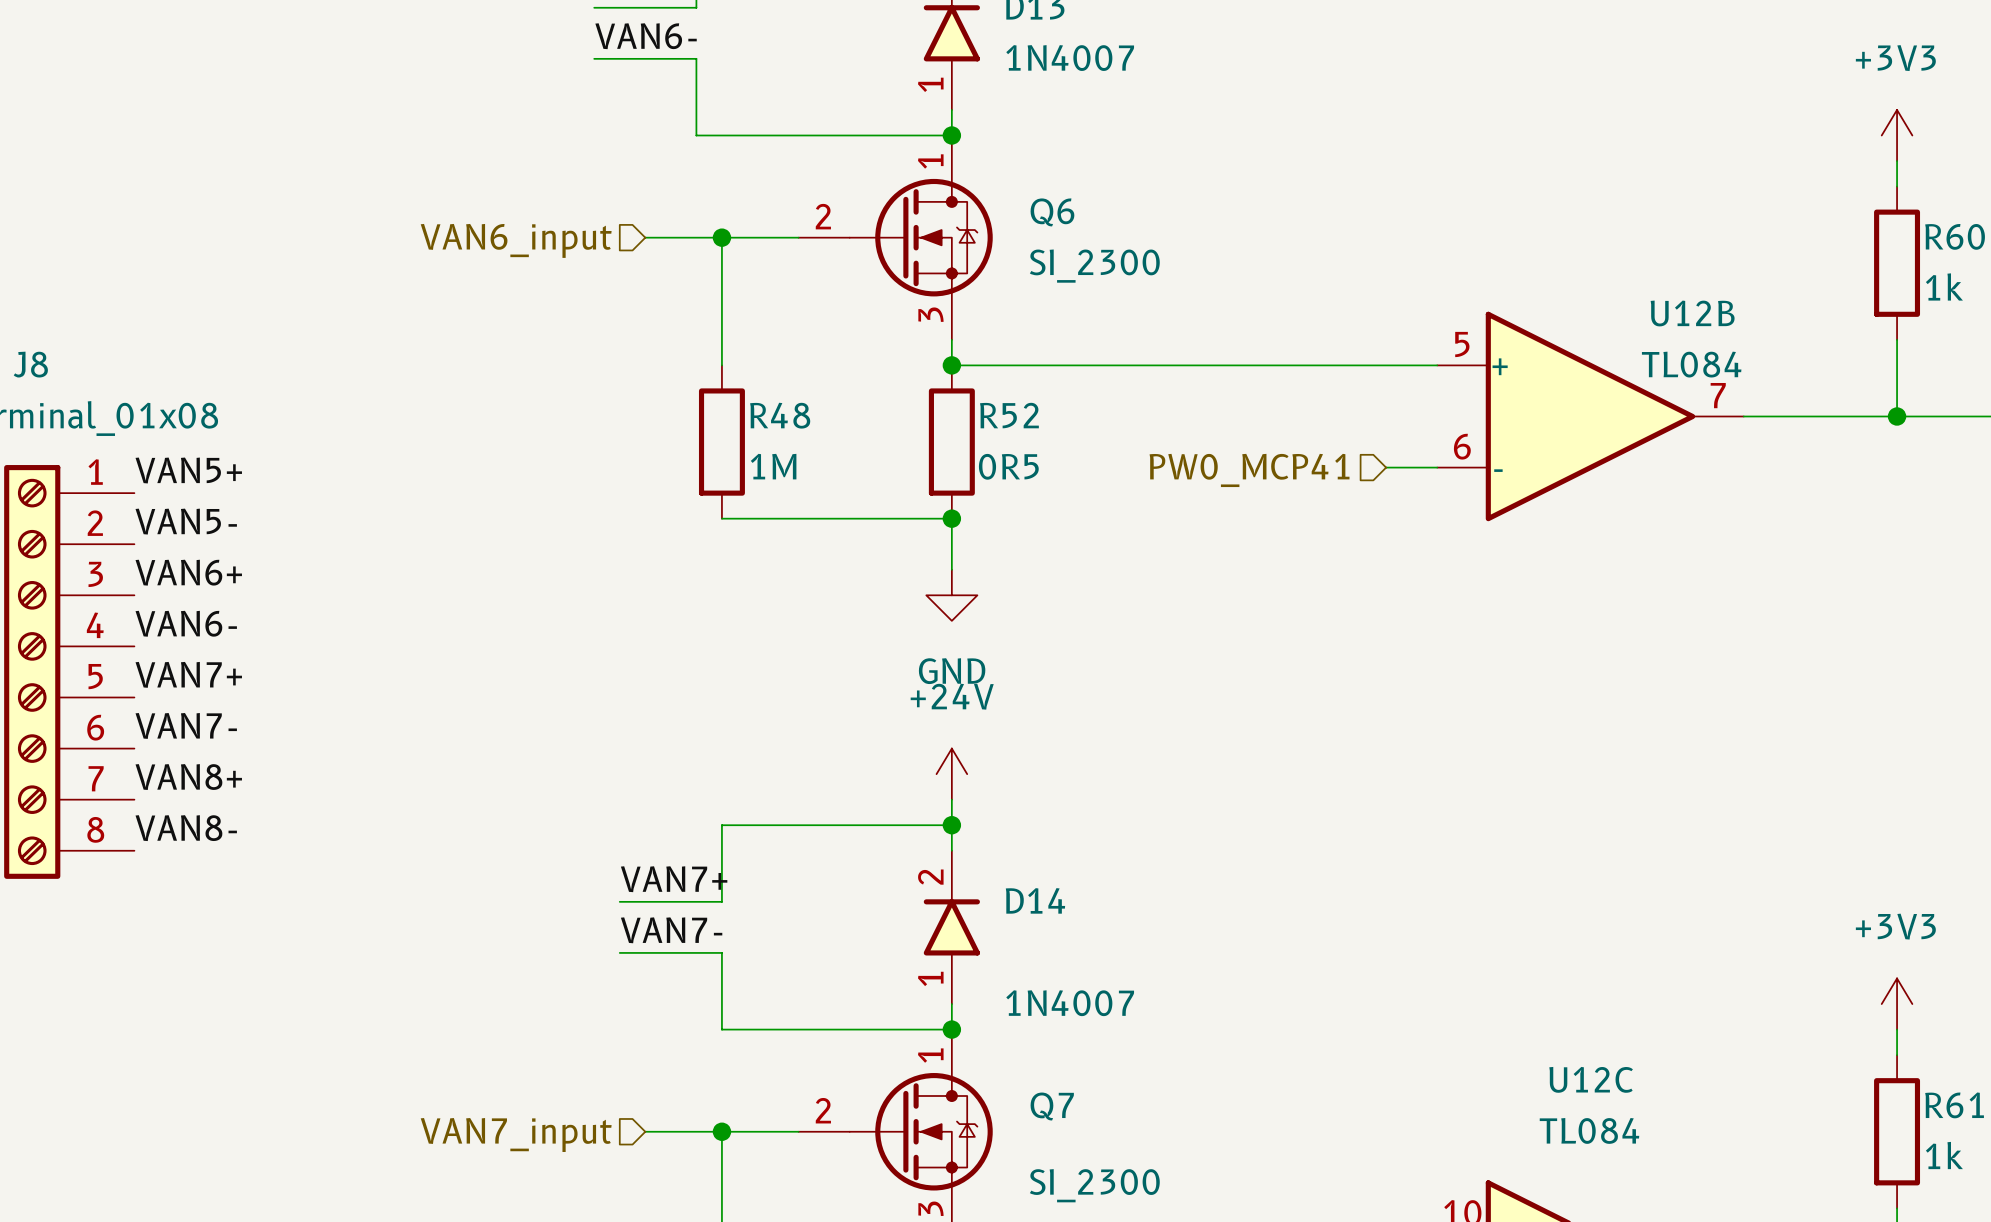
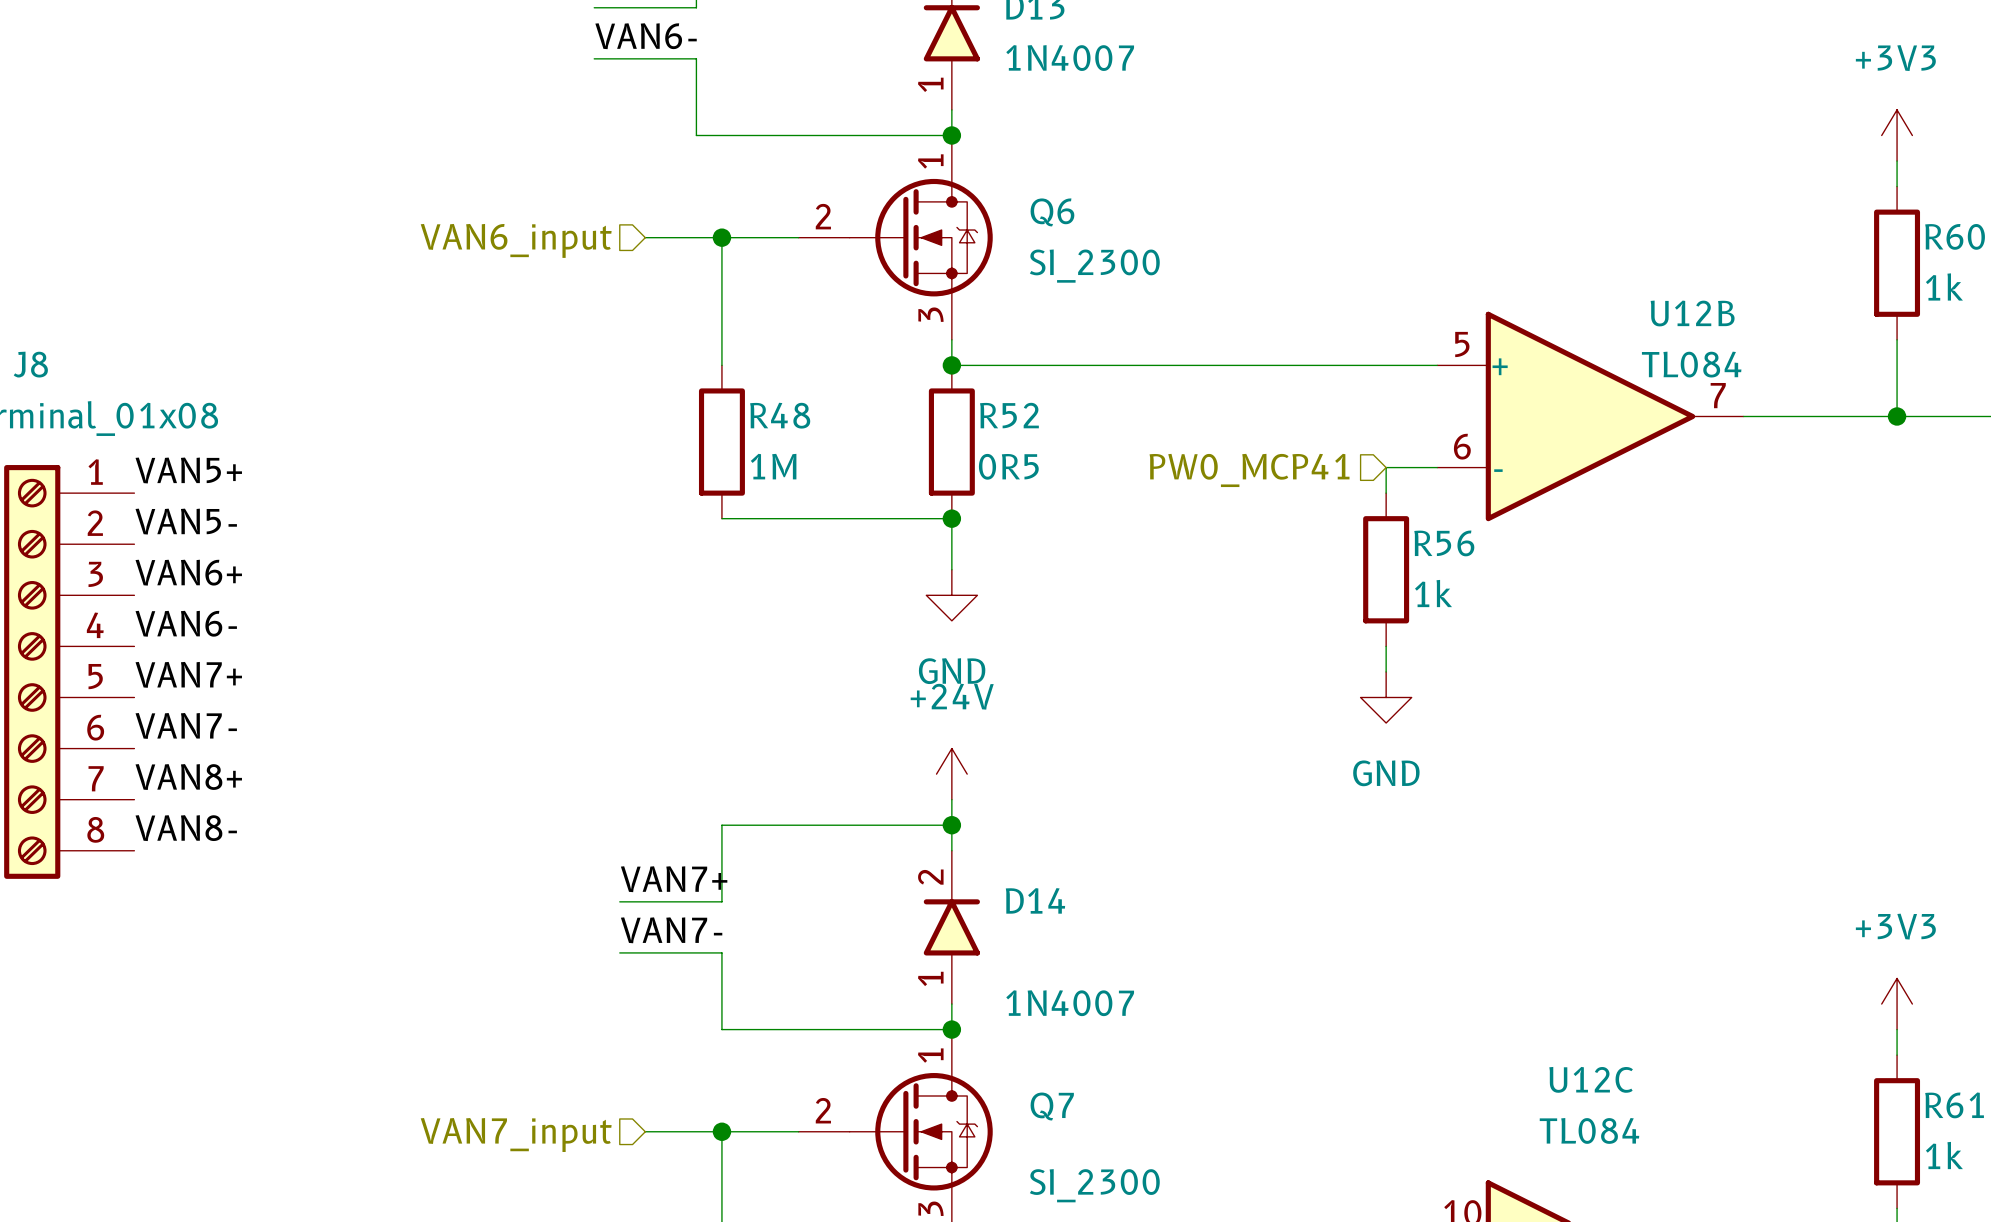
wire: none -> (1386, 467) (1386, 493)
R56: none -> 1k (1386, 569)
wire: none -> (1386, 646) (1386, 671)
power symbol: none -> GND (1386, 697)

